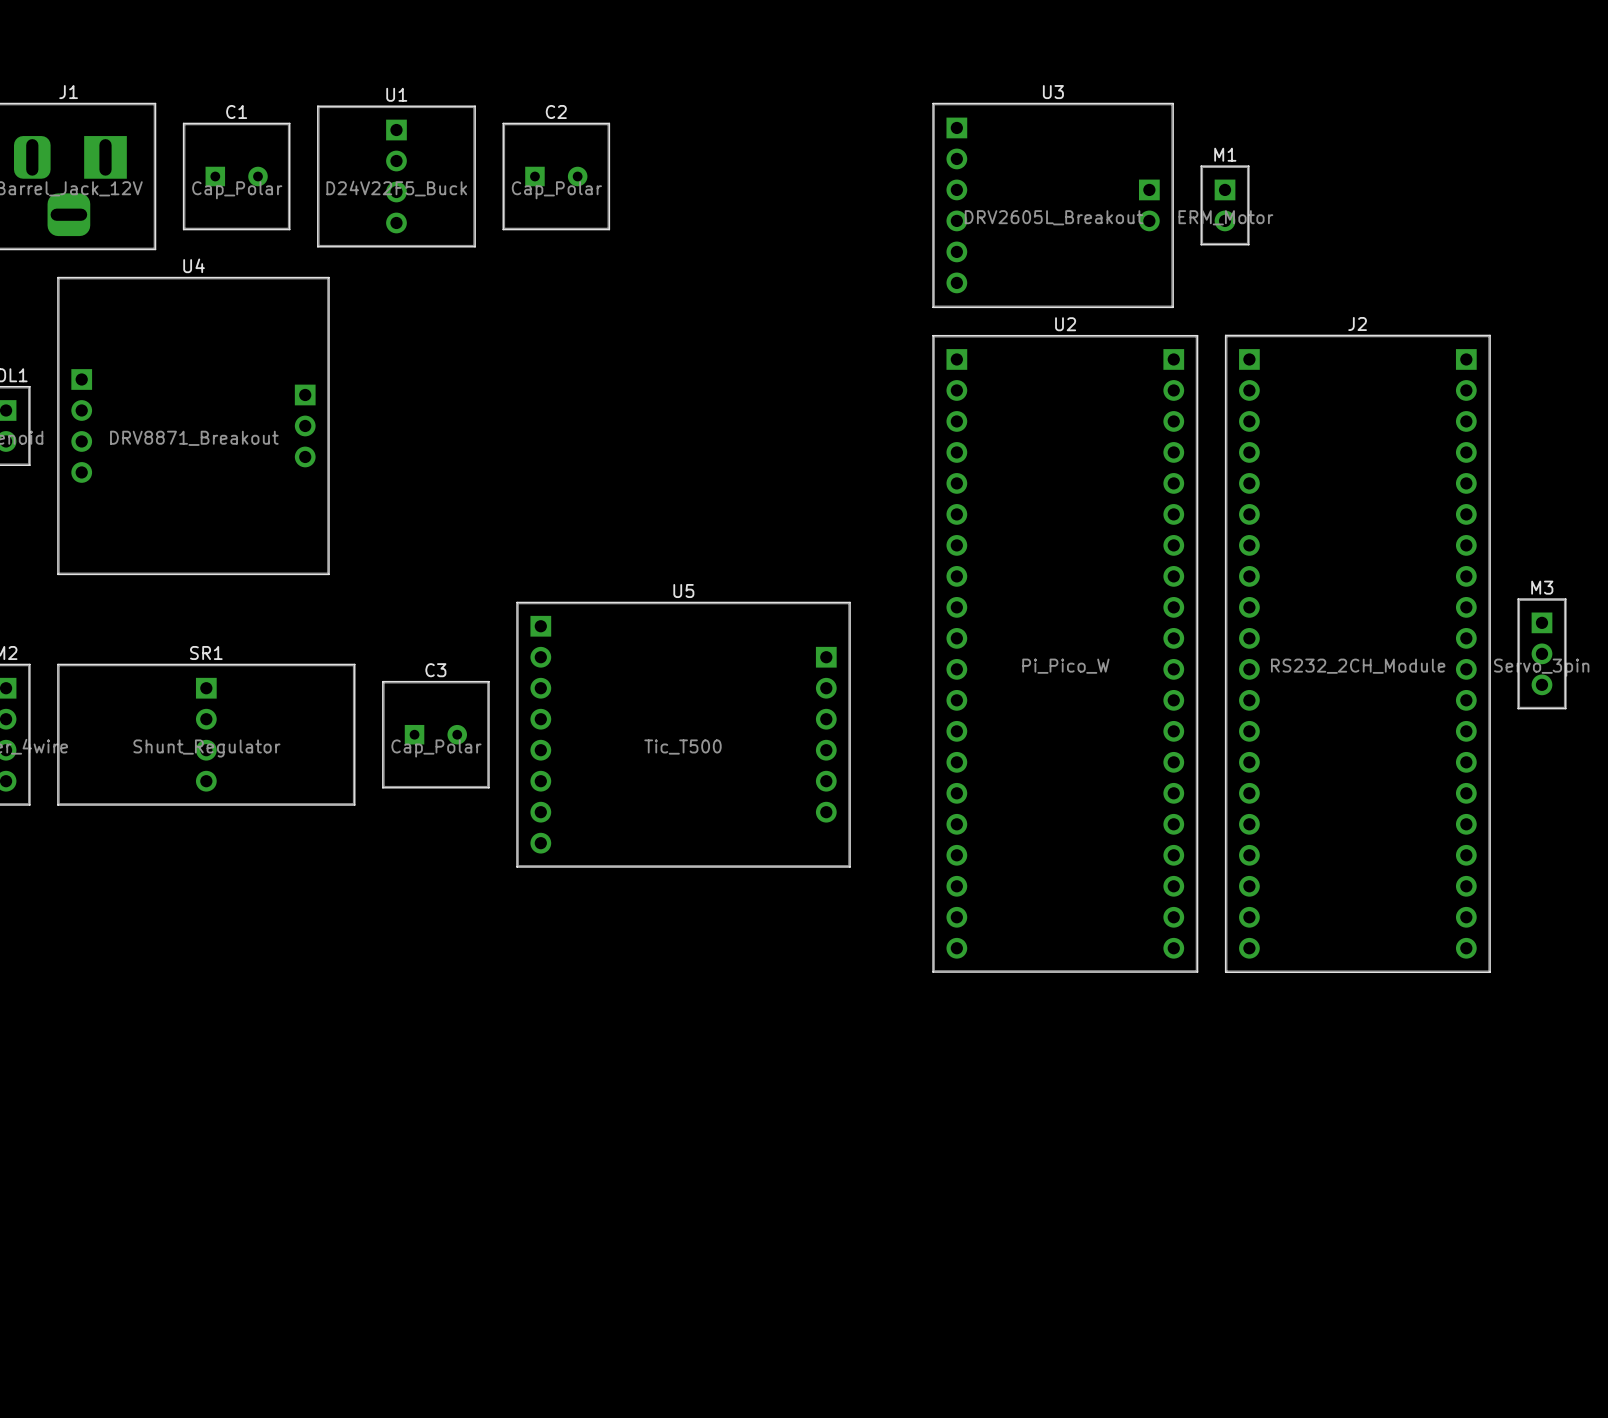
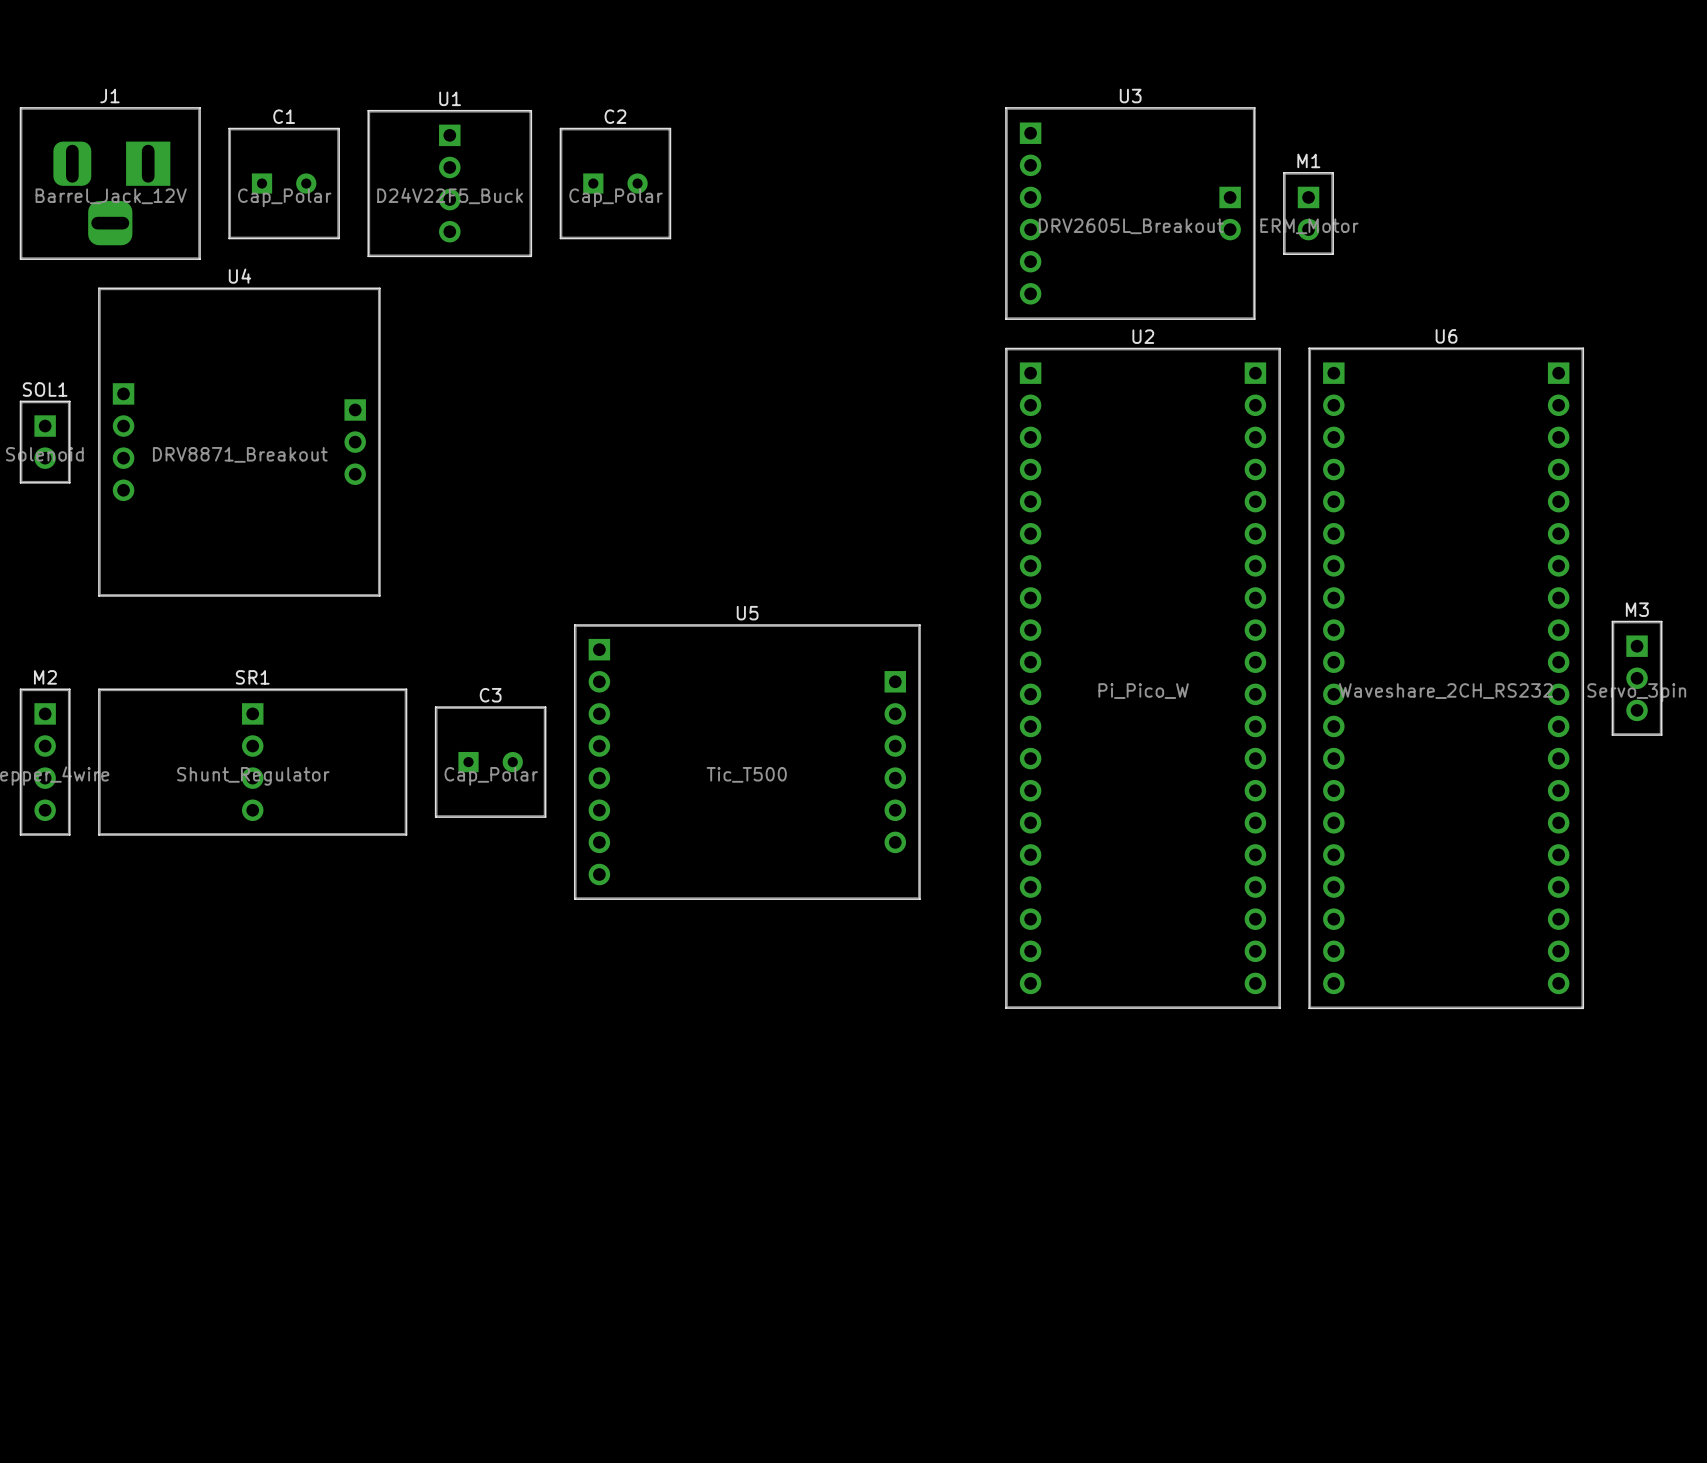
J2 name: J2 (1357, 323) -> U6 (1446, 336)
J2 value: RS232_2CH_Module (1358, 666) -> Waveshare_2CH_RS232 (1445, 691)

